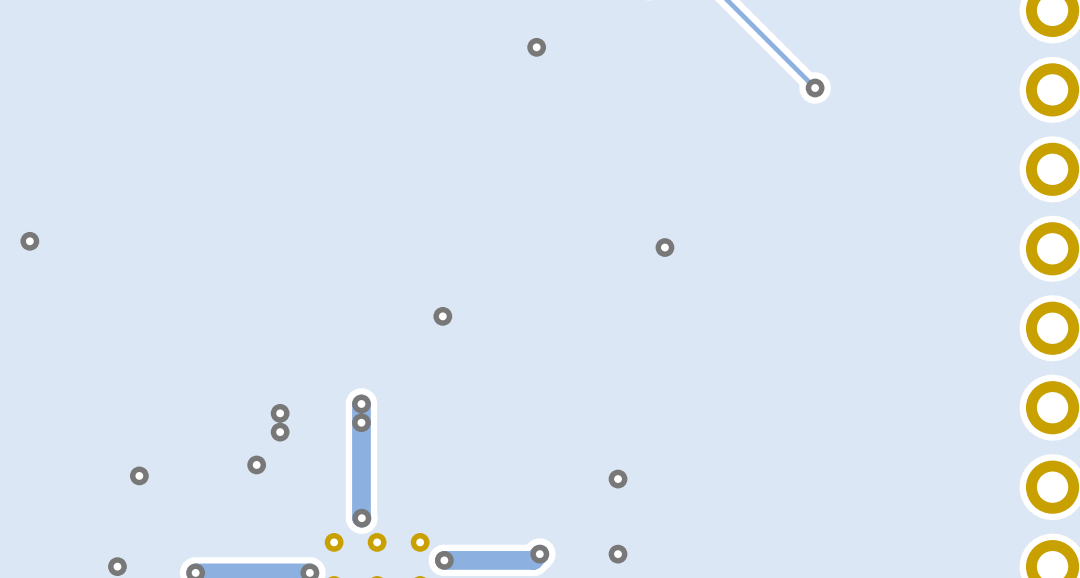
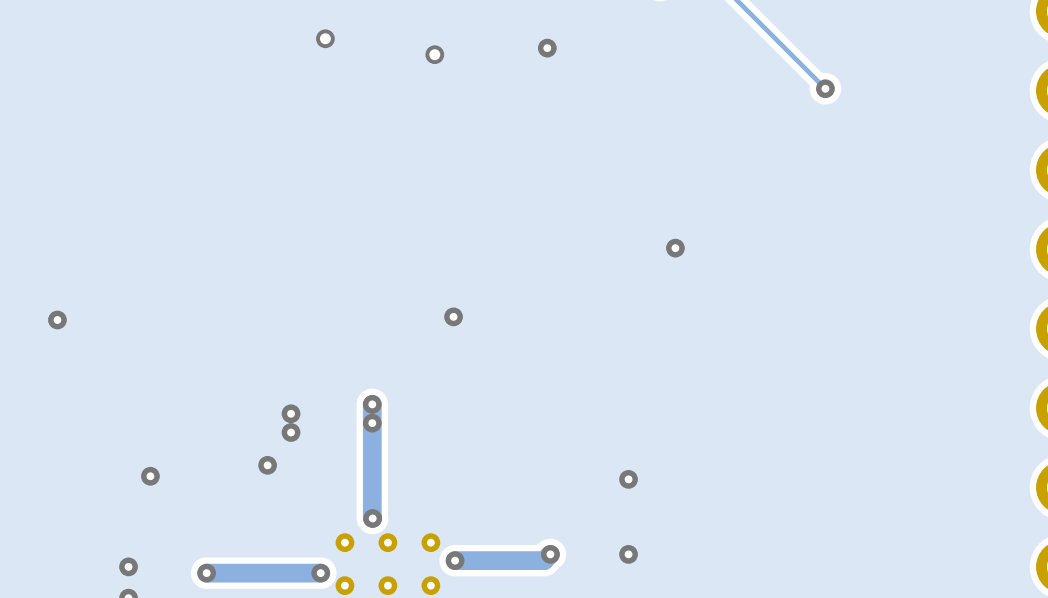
via: none -> (325, 38)
via: none -> (434, 54)
via position: (29, 241) -> (57, 320)

